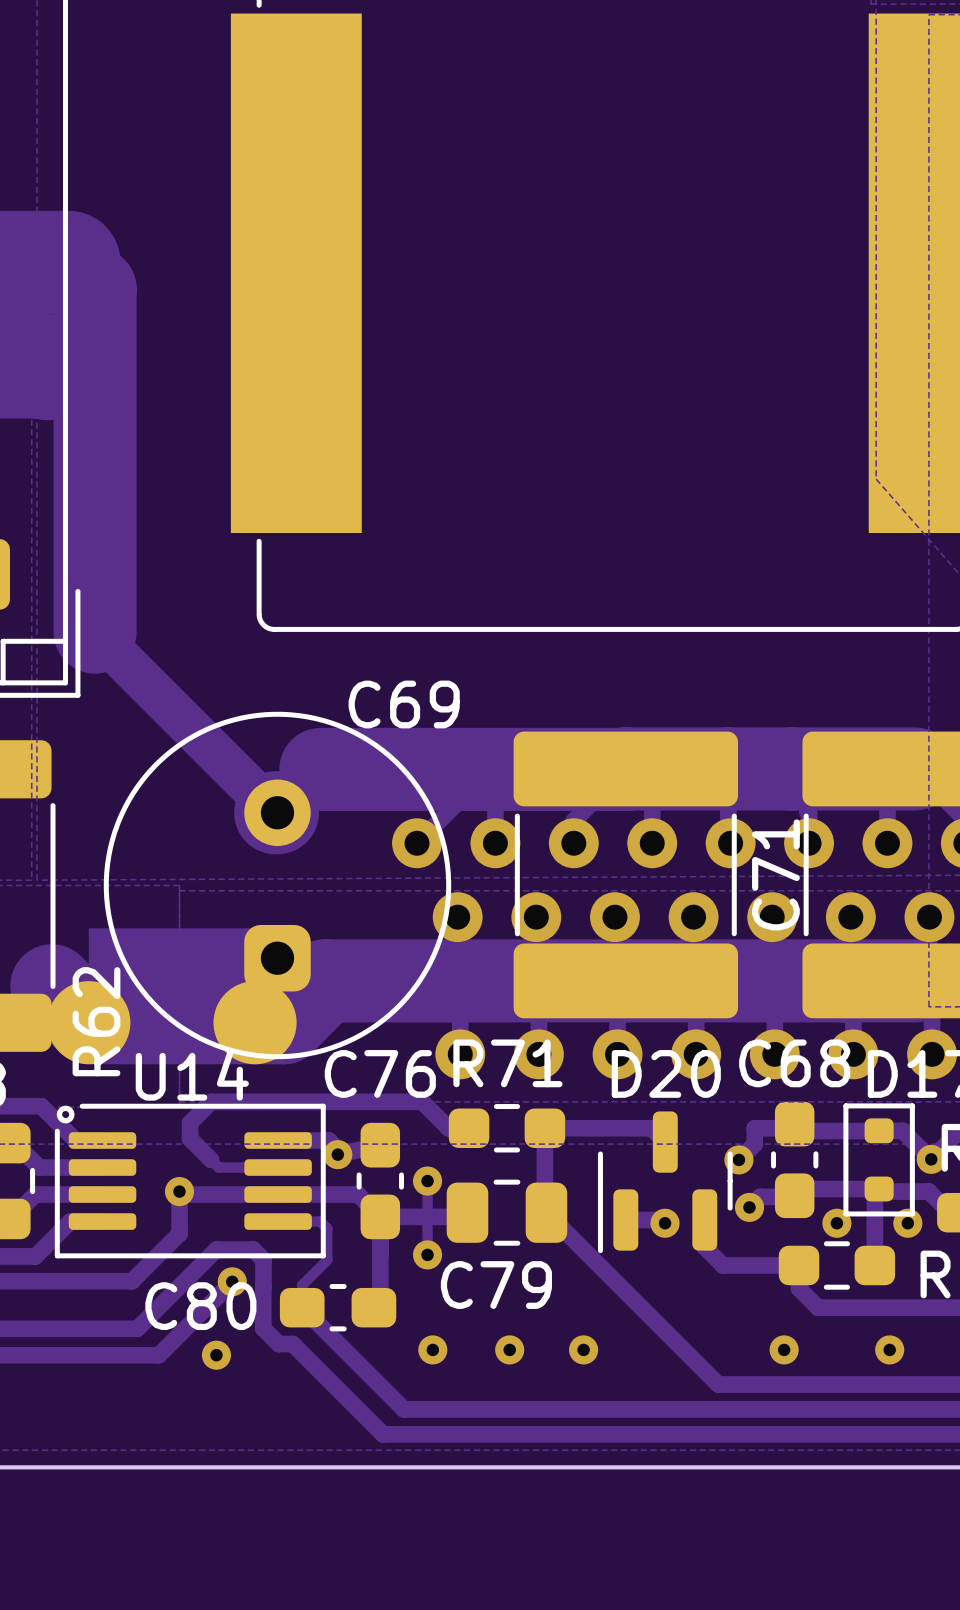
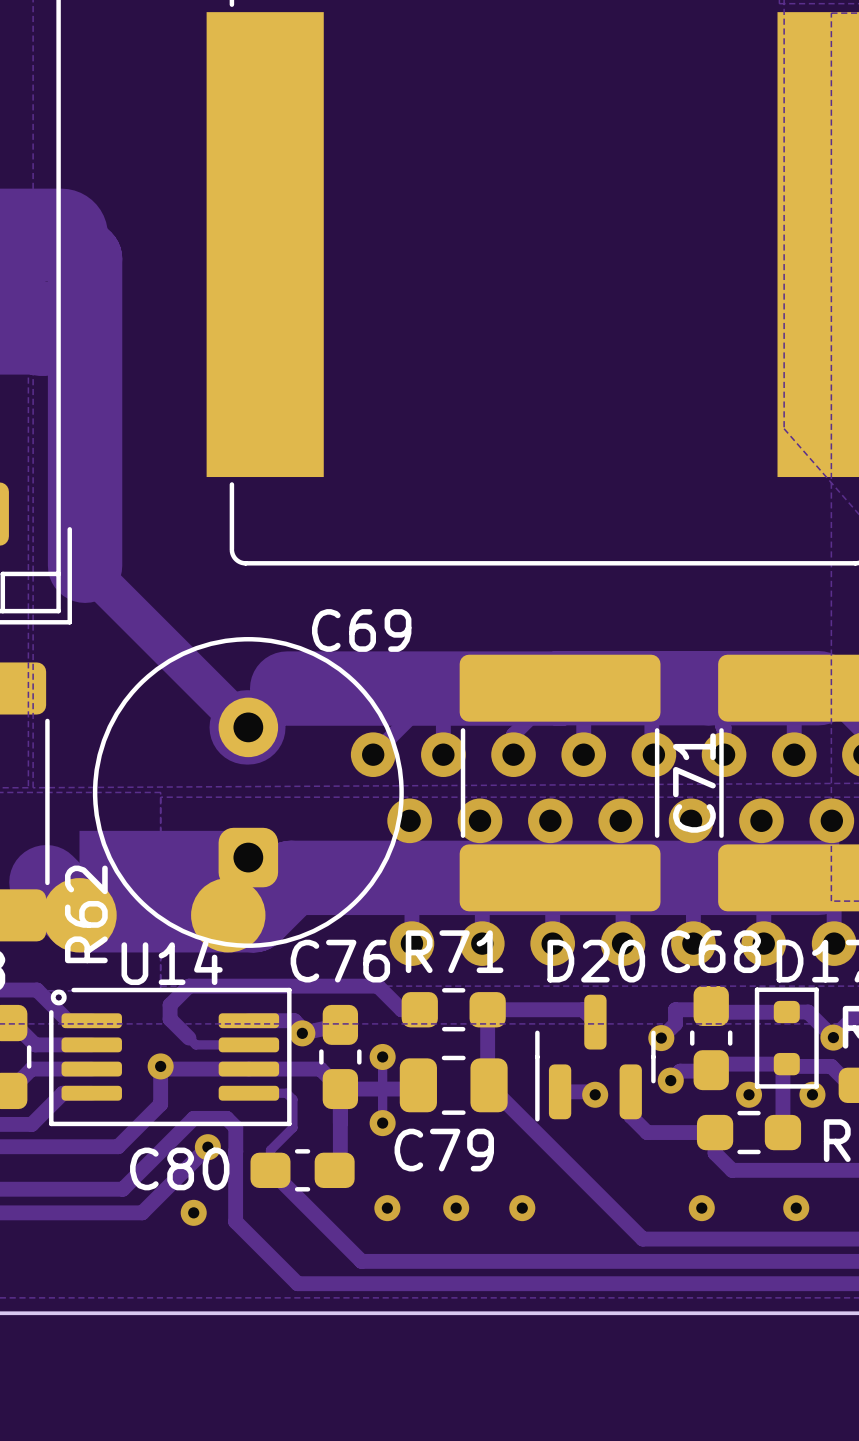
track: (263, 1328) (278, 1344) (292, 1344) (383, 1434) -> (235, 1188) (235, 1221) (297, 1283) (342, 1283)

